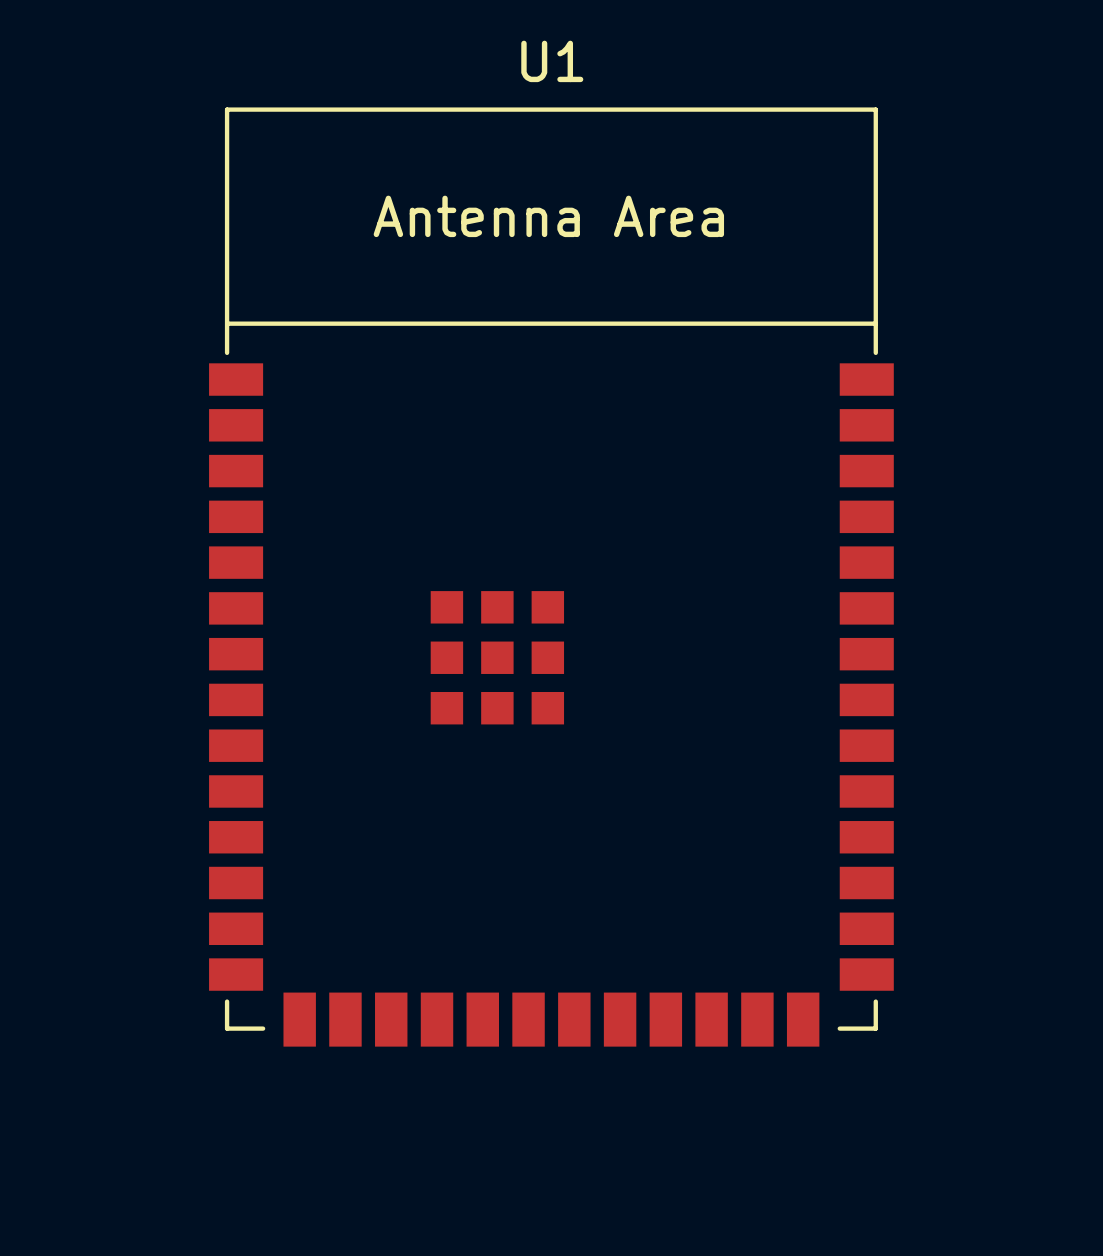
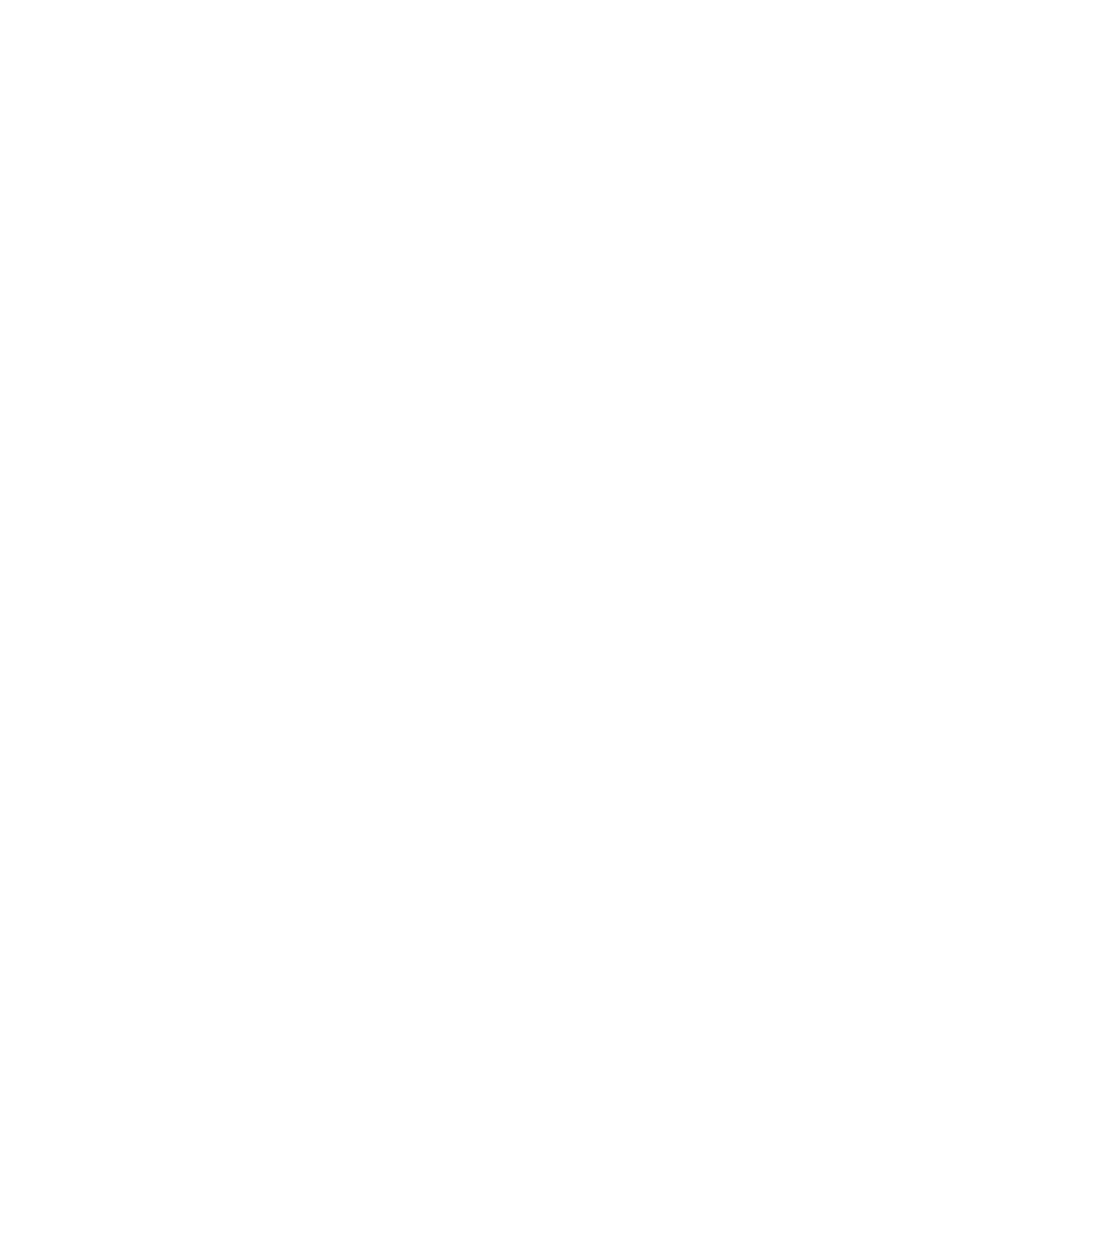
U1: (551, 577) -> none

